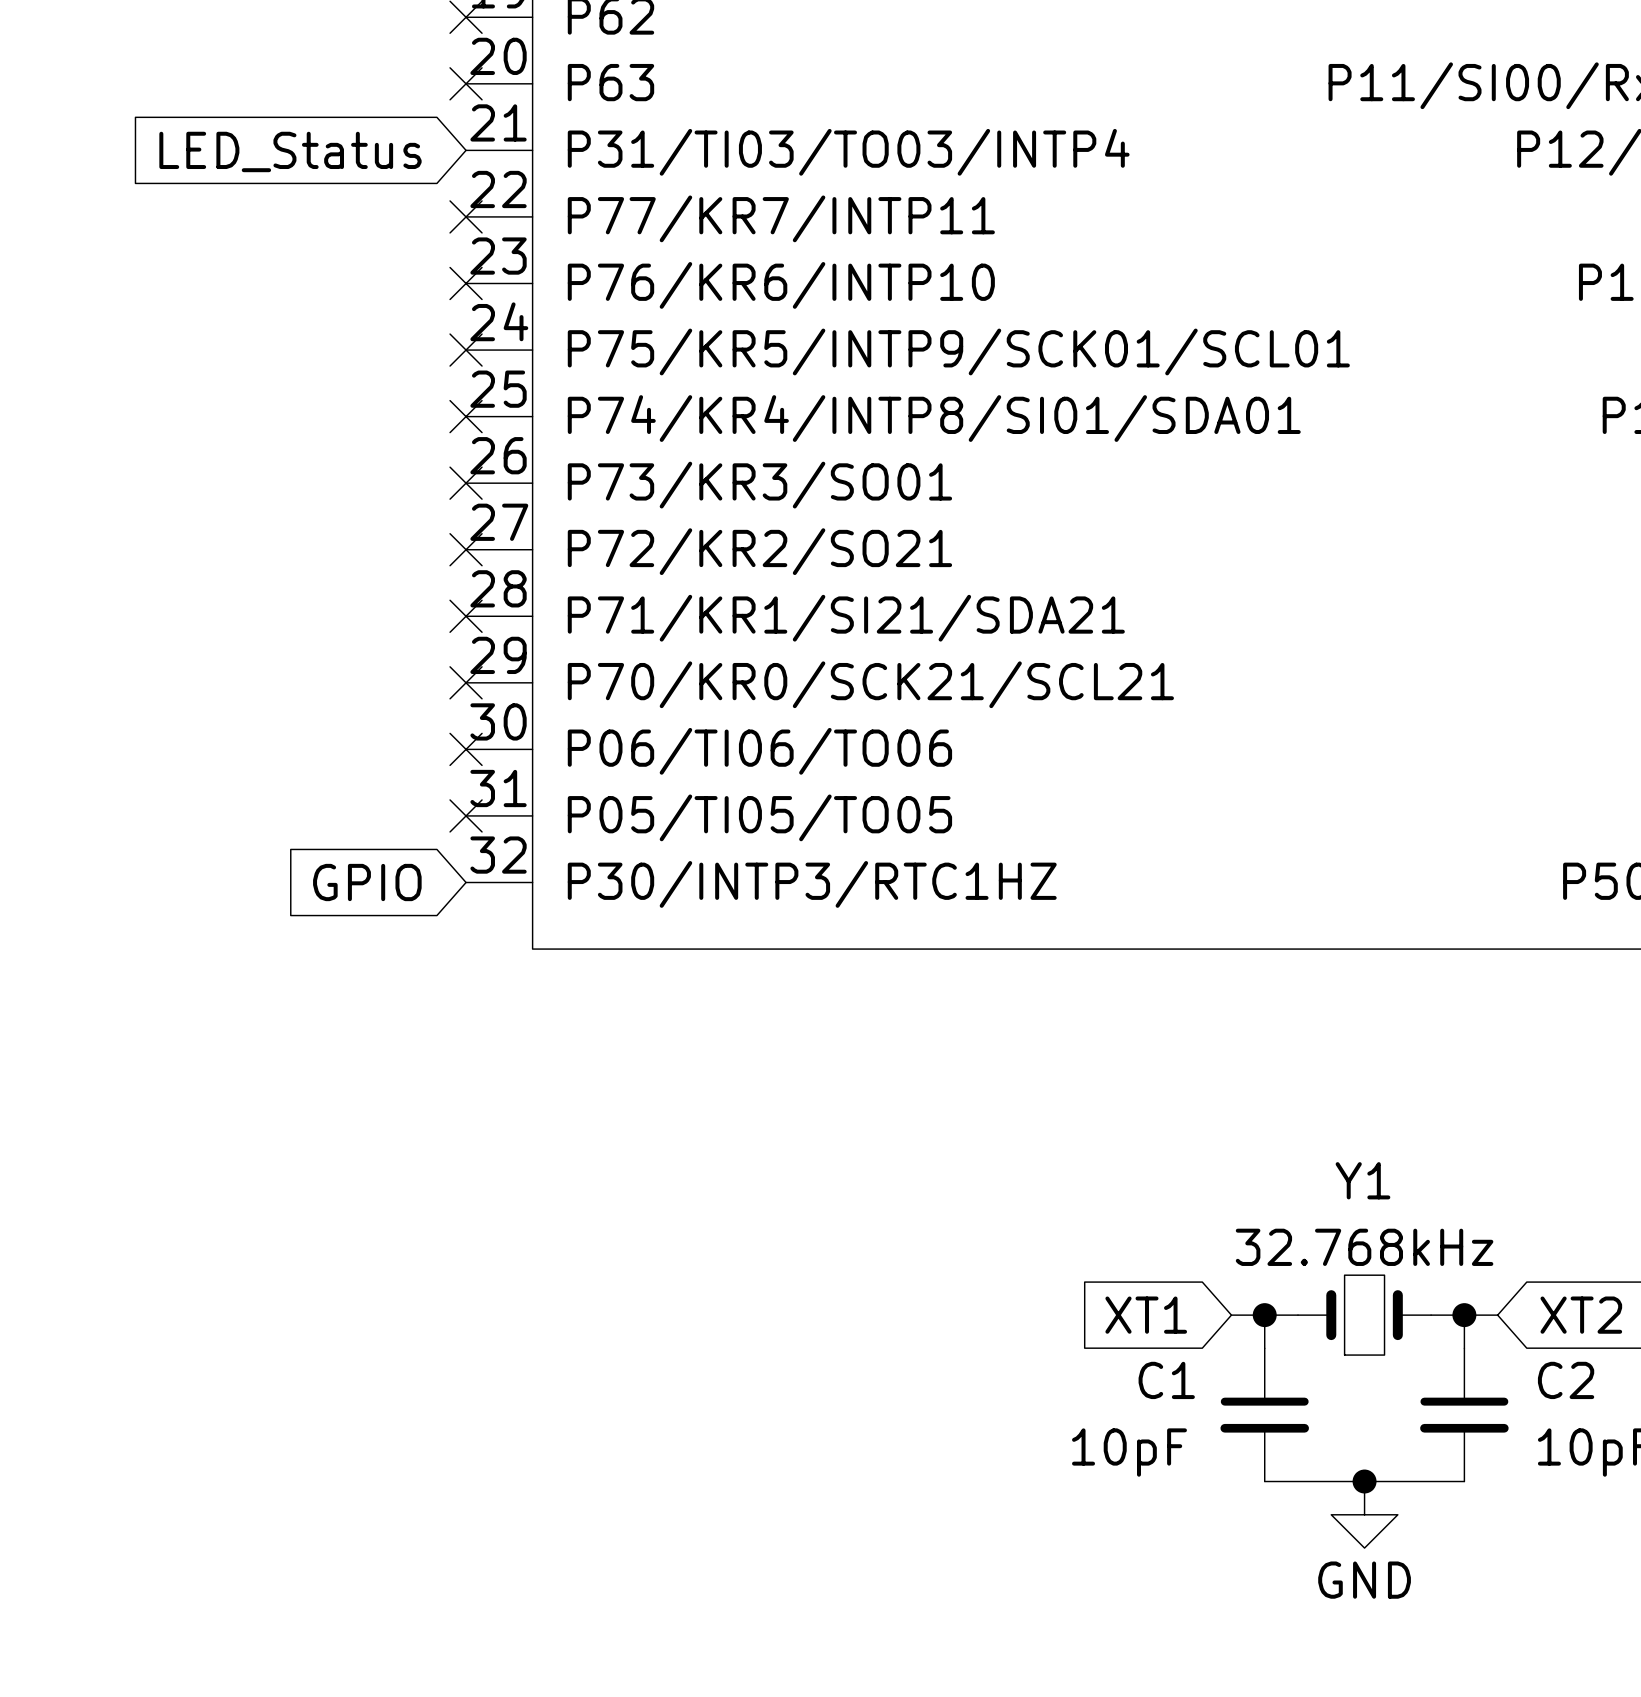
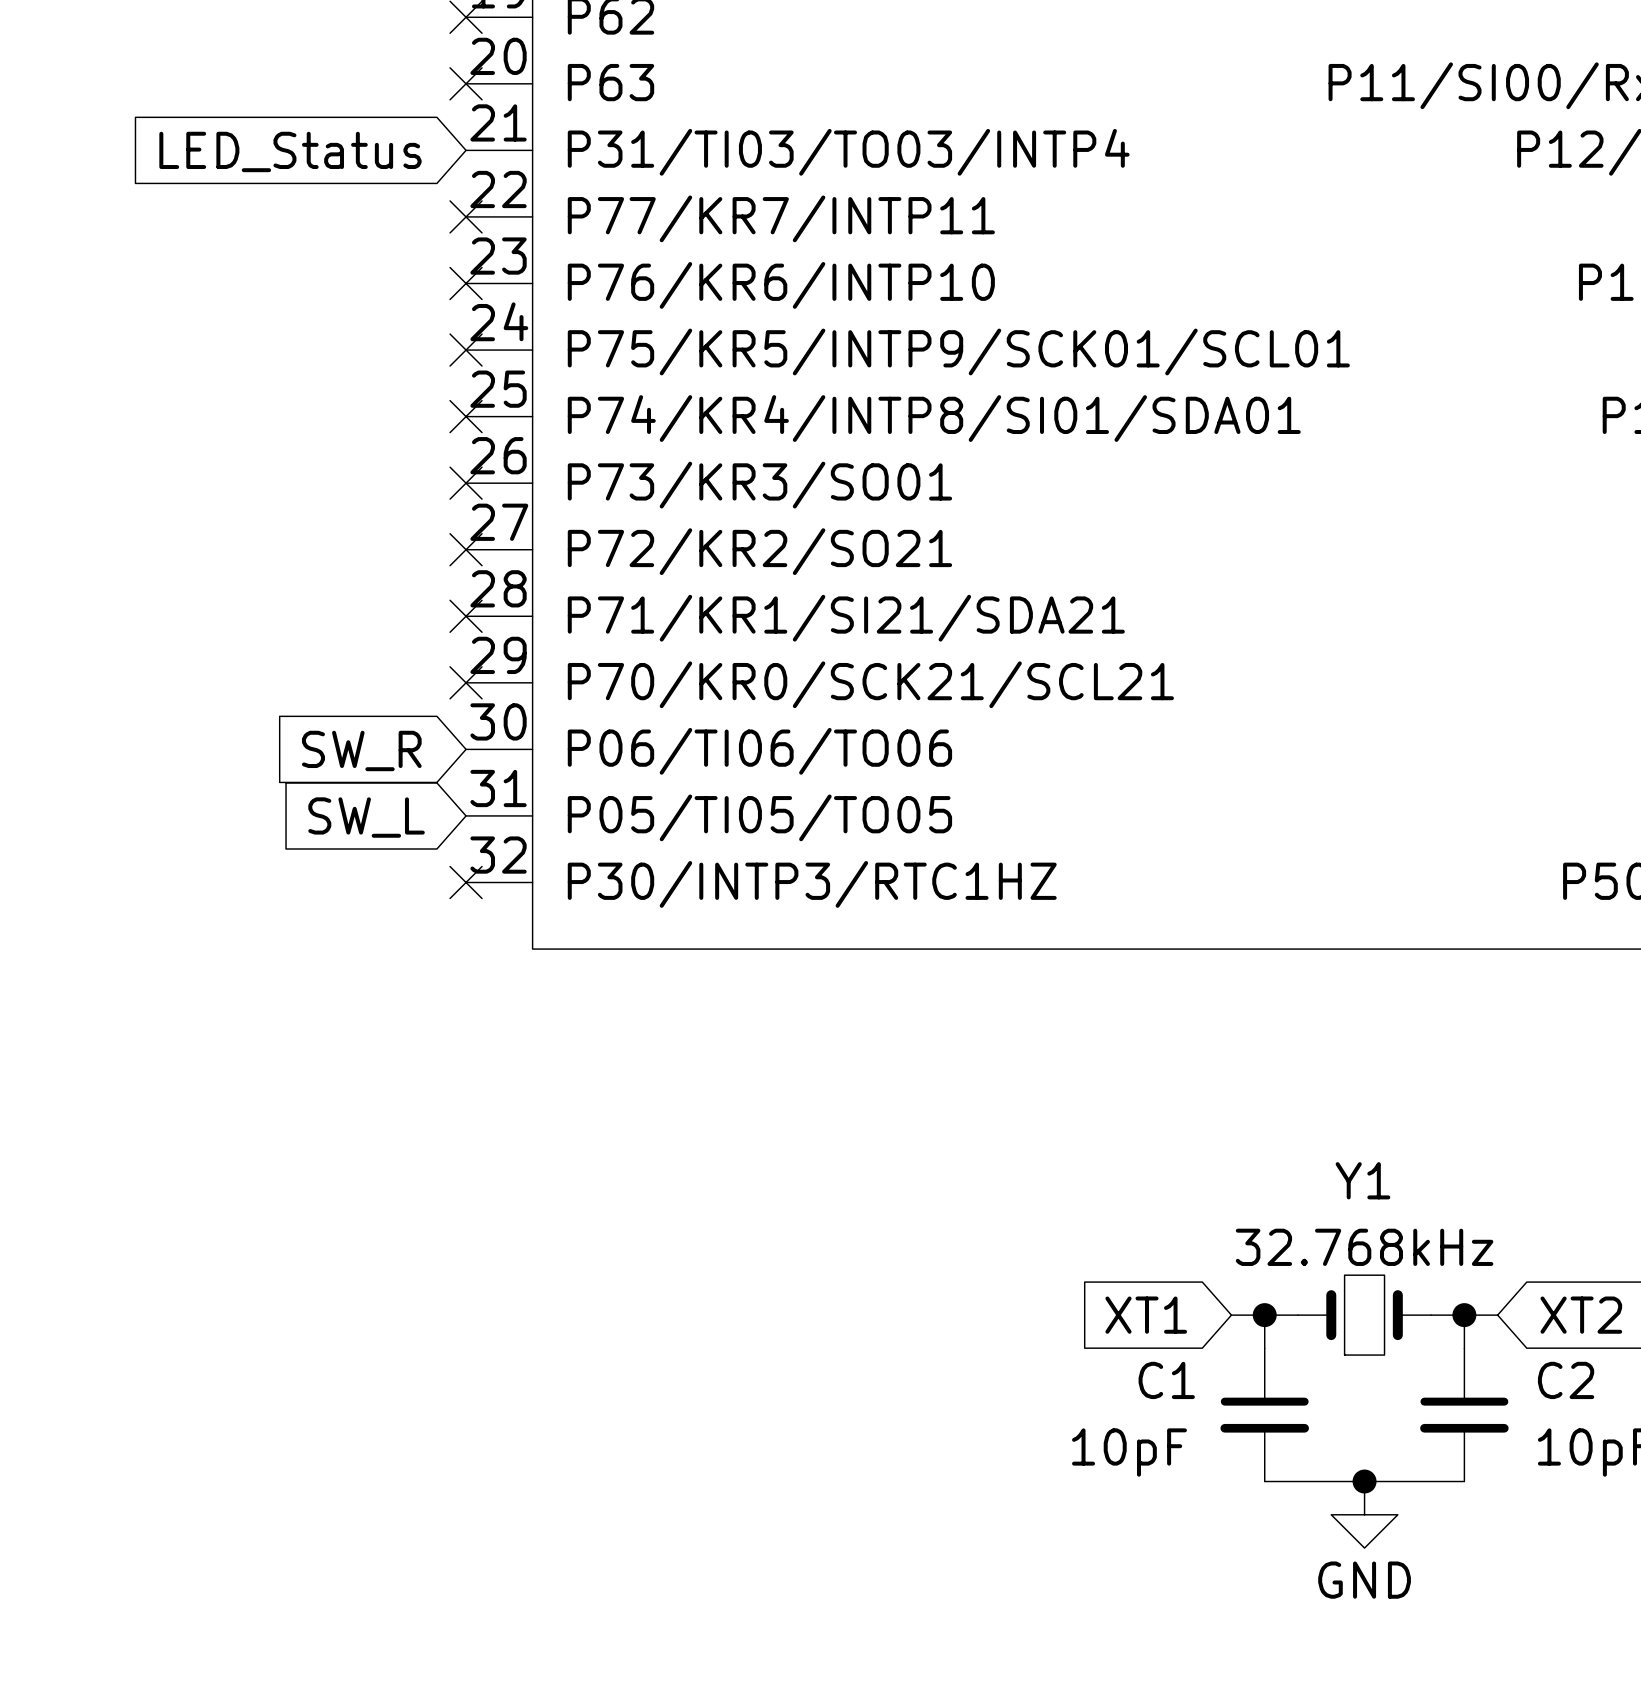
no-connect mark: (466, 749) -> none
global label: none -> SW_R (361, 750)
no-connect mark: (466, 815) -> none
global label: none -> SW_L (366, 817)
global label: GPIO (367, 882) -> none
no-connect mark: none -> (466, 882)

